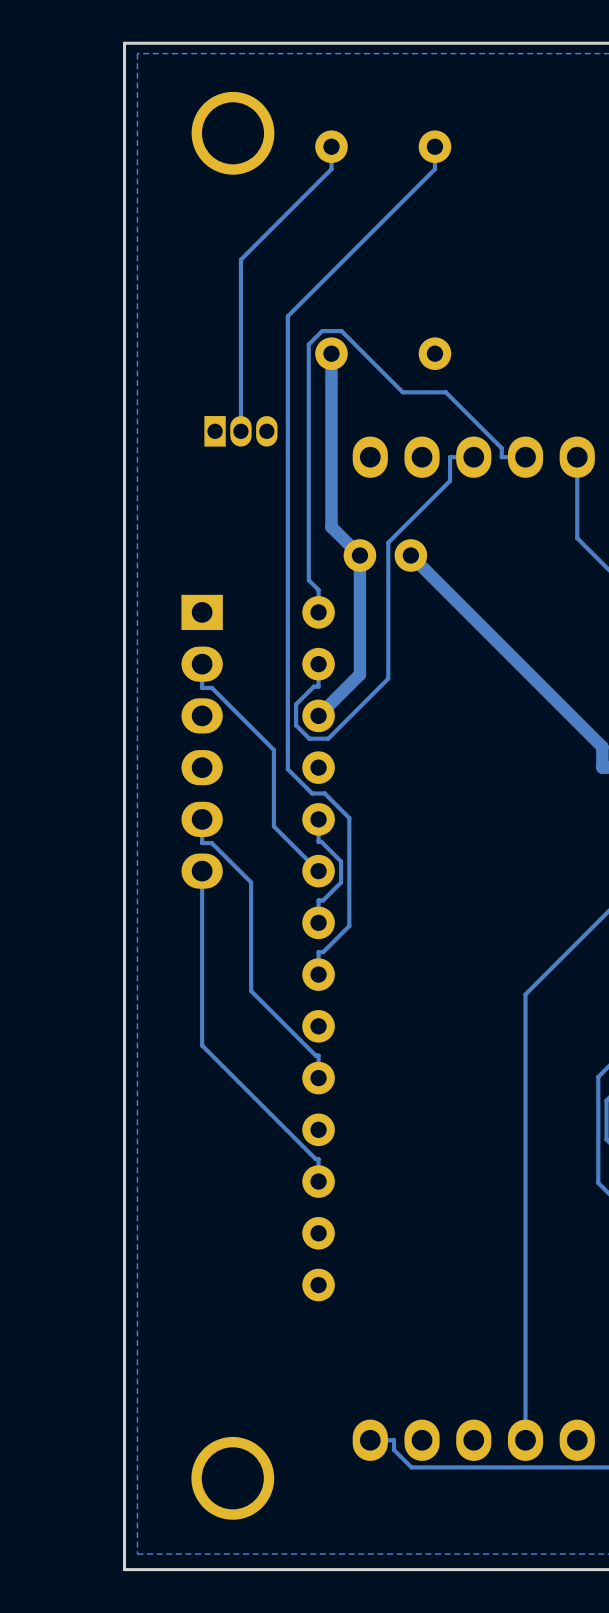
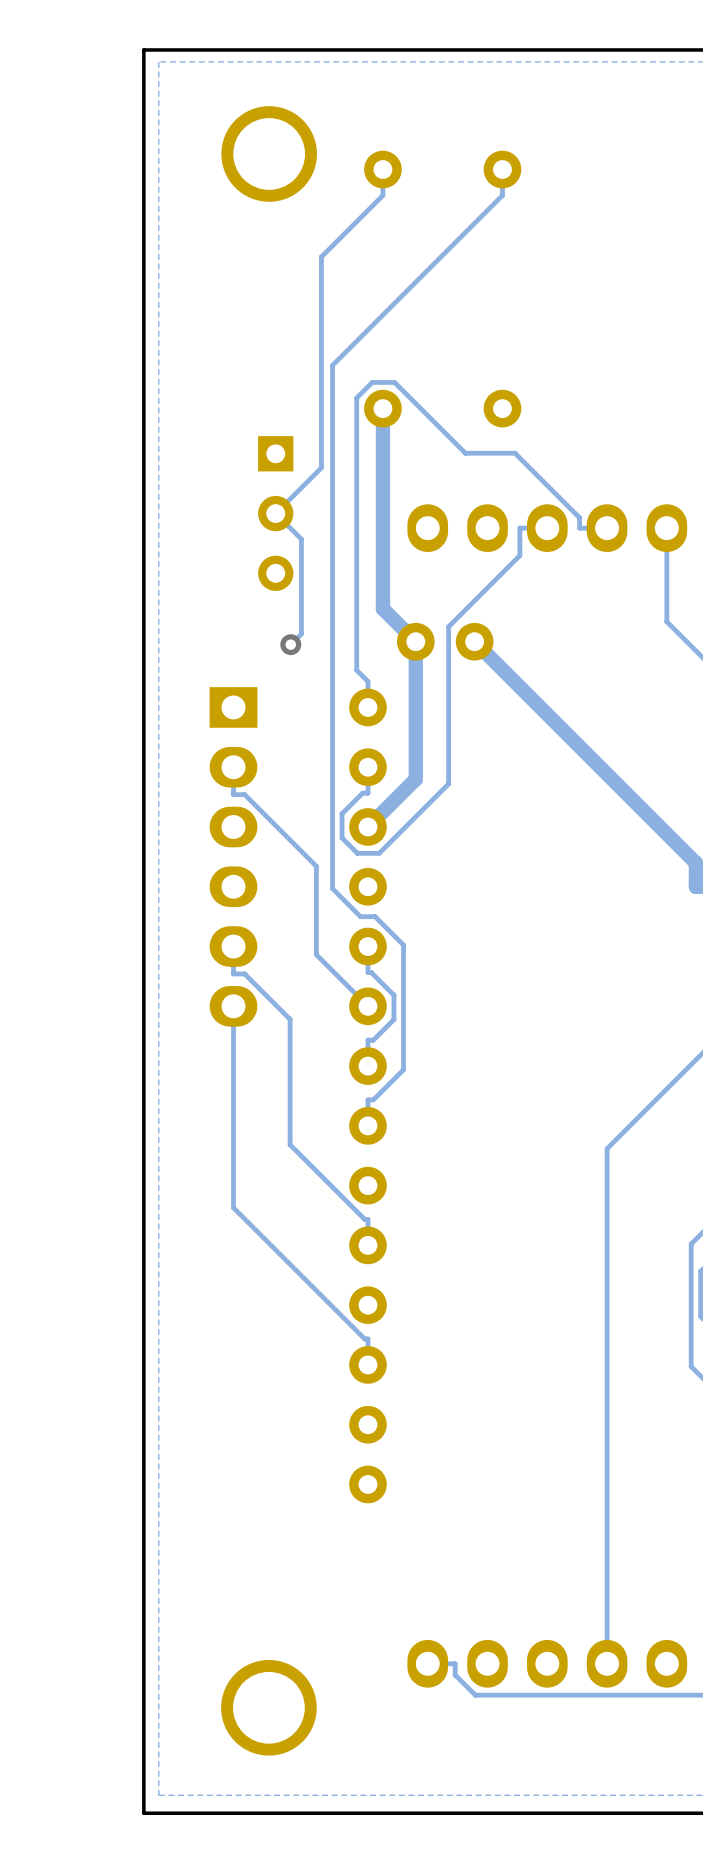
track: (278, 222) (240, 259) (240, 431) -> (321, 256) (321, 467) (275, 513) (301, 539) (301, 634) (290, 644)
part footprint: [204, 416, 278, 447] -> [258, 436, 294, 591]
via: none -> (290, 644)

